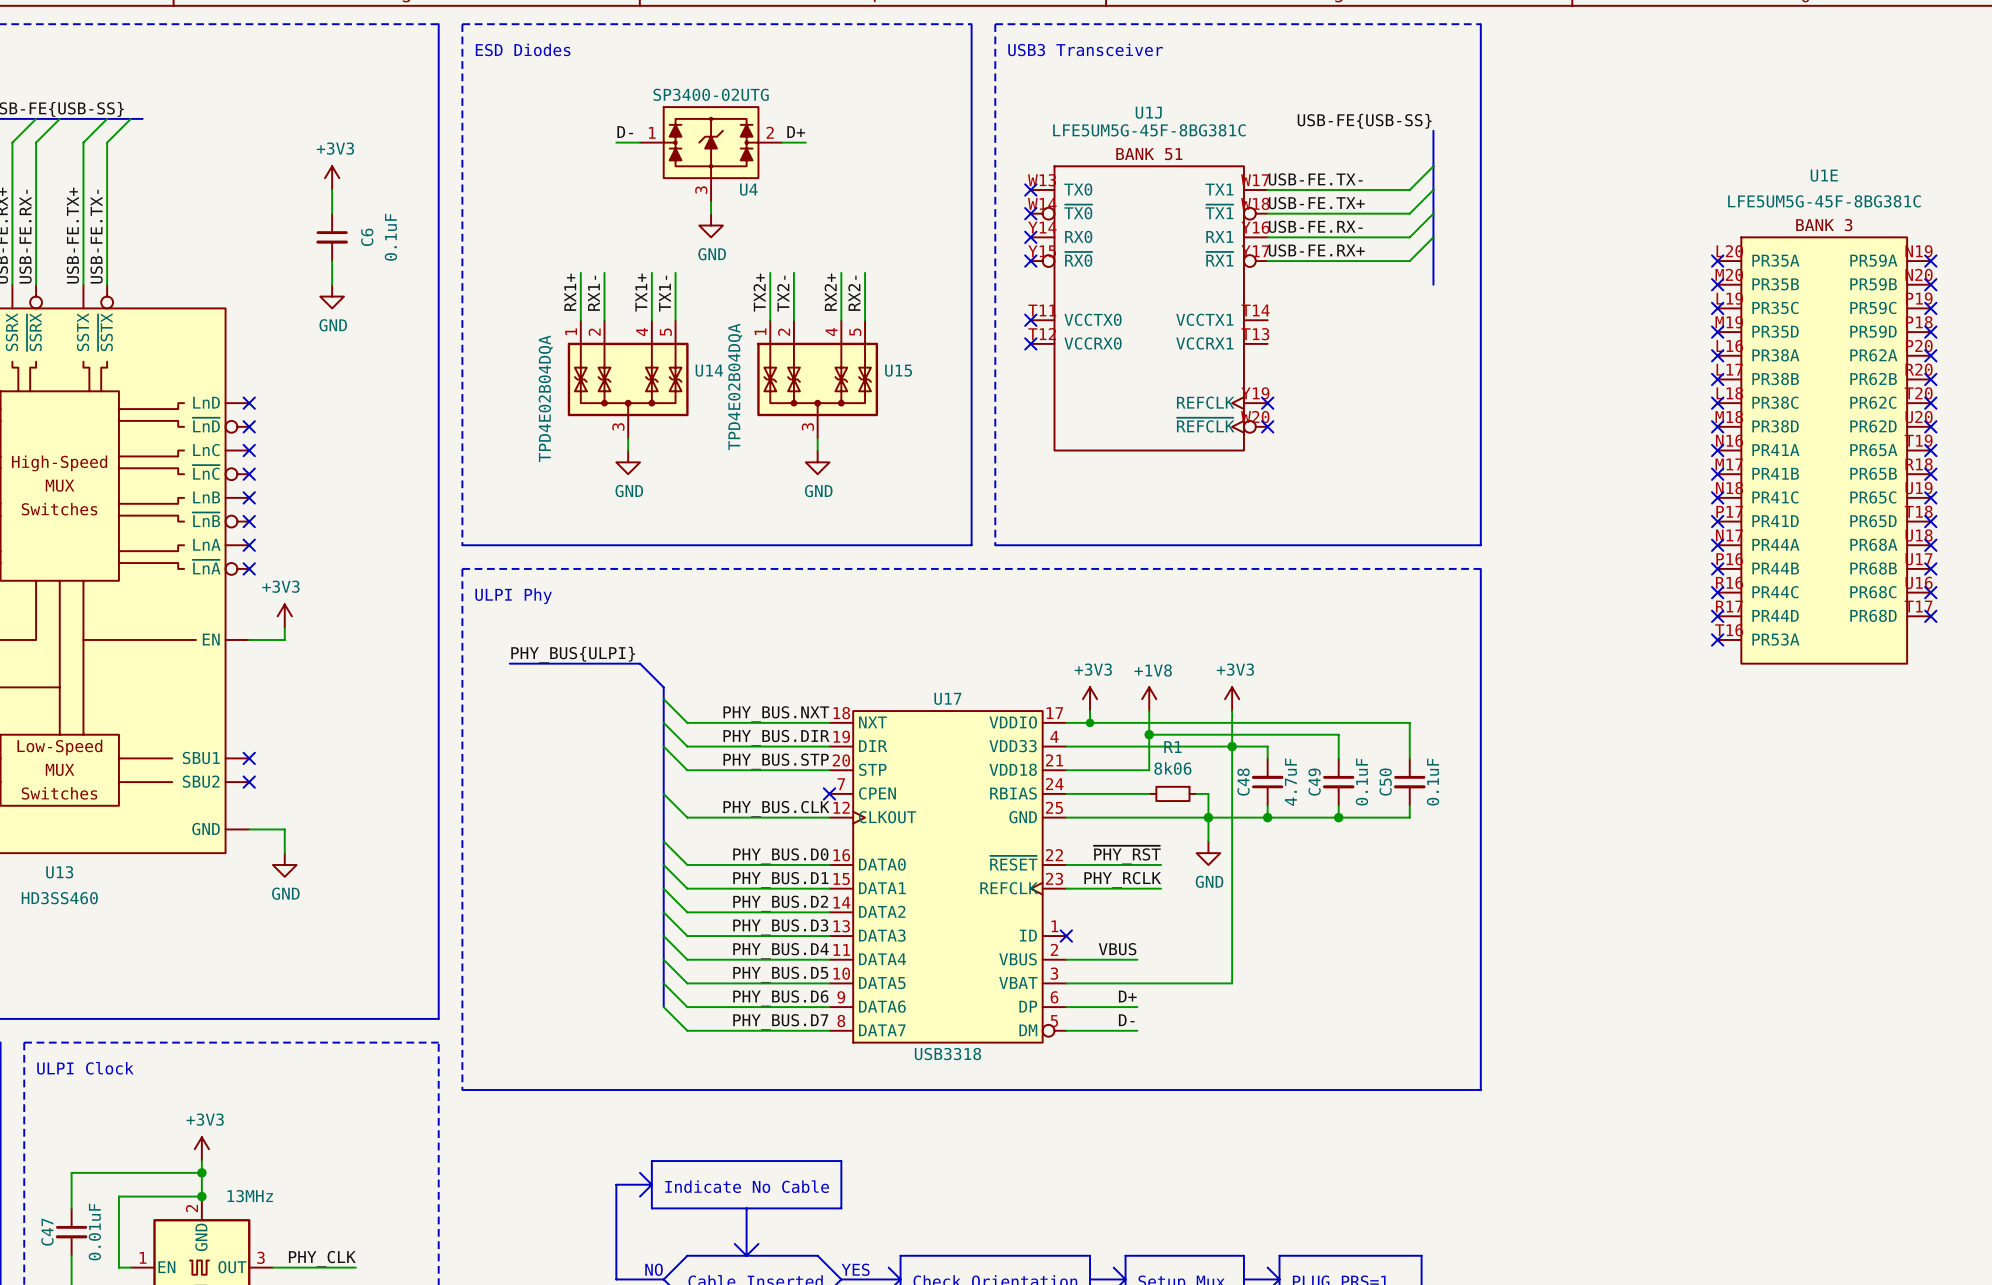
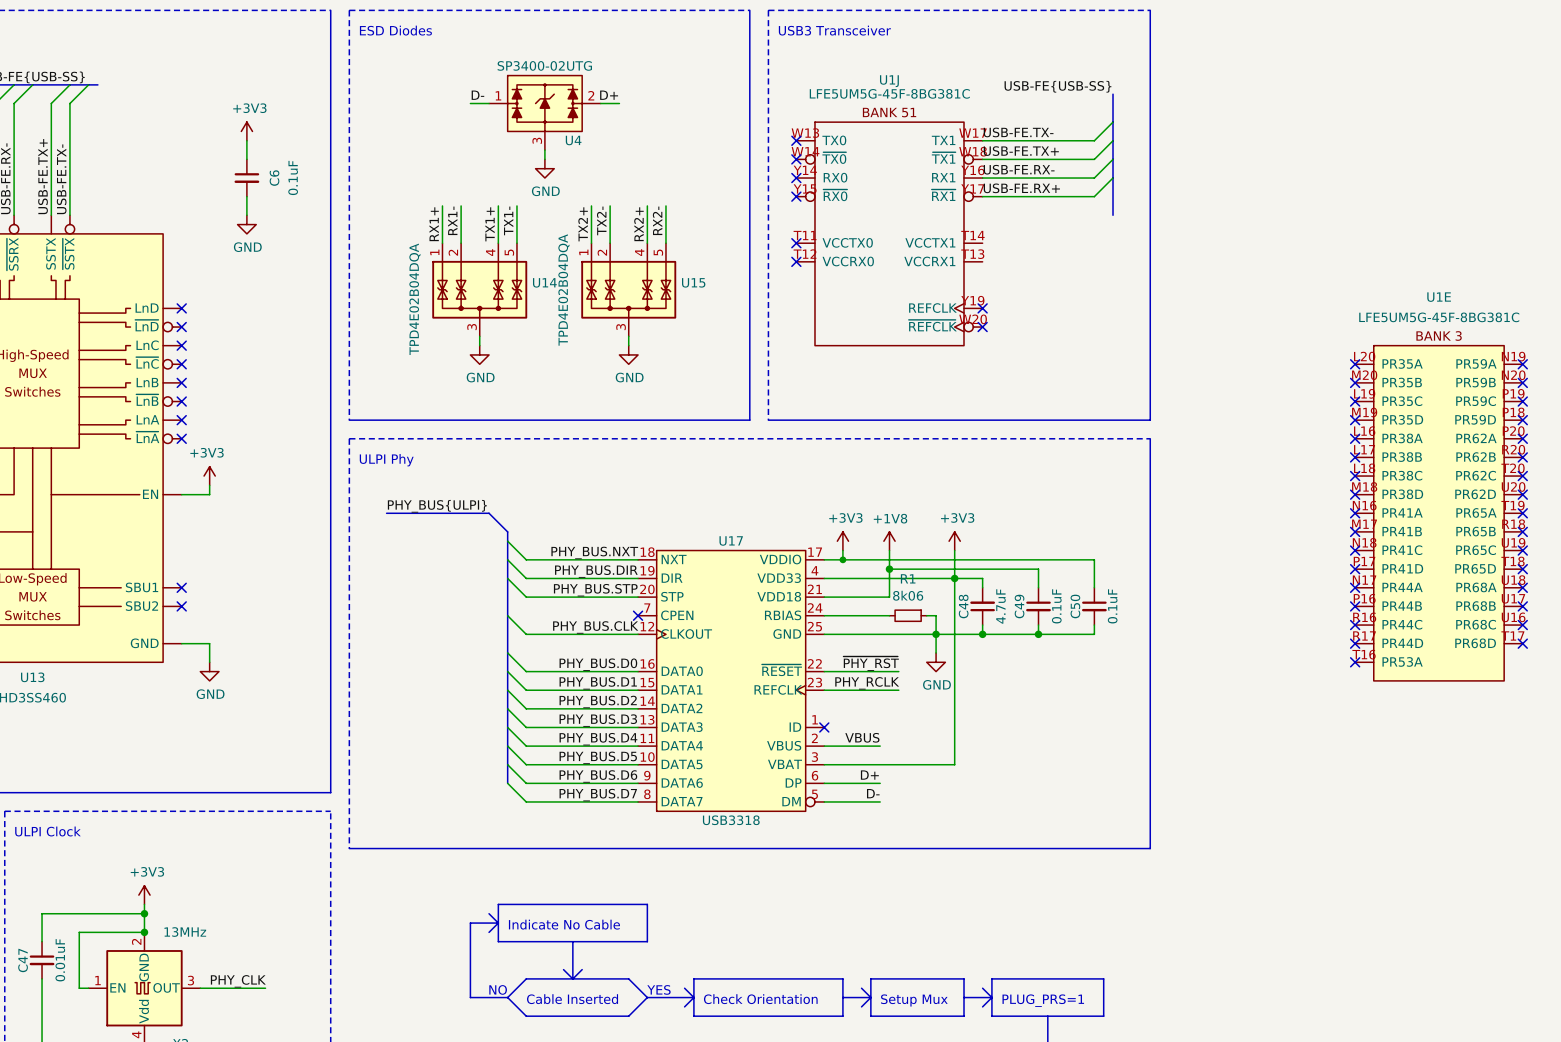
no-connect mark: (1717, 261) -> none
no-connect mark: (1930, 261) -> none
no-connect mark: (1717, 284) -> none
no-connect mark: (1930, 284) -> none
no-connect mark: (1717, 308) -> none
no-connect mark: (1930, 308) -> none
no-connect mark: (1717, 332) -> none
no-connect mark: (1930, 332) -> none
no-connect mark: (1717, 355) -> none
no-connect mark: (1930, 355) -> none
no-connect mark: (1717, 379) -> none
no-connect mark: (1930, 379) -> none
no-connect mark: (1717, 403) -> none
no-connect mark: (1930, 403) -> none
no-connect mark: (1717, 426) -> none
no-connect mark: (1930, 426) -> none
no-connect mark: (1717, 450) -> none
U1E position: (1824, 450) -> (1438, 513)
no-connect mark: (1930, 450) -> none
no-connect mark: (1717, 474) -> none
no-connect mark: none -> (1355, 364)
no-connect mark: (1930, 474) -> none
no-connect mark: none -> (1522, 364)
no-connect mark: (1717, 497) -> none
no-connect mark: none -> (1355, 382)
no-connect mark: (1930, 497) -> none
no-connect mark: none -> (1522, 382)
no-connect mark: (1717, 521) -> none
no-connect mark: none -> (1355, 401)
no-connect mark: (1930, 521) -> none
no-connect mark: none -> (1522, 401)
no-connect mark: (1717, 545) -> none
no-connect mark: none -> (1355, 420)
no-connect mark: (1930, 545) -> none
no-connect mark: none -> (1522, 420)
no-connect mark: (1717, 568) -> none
no-connect mark: none -> (1355, 438)
no-connect mark: (1930, 568) -> none
no-connect mark: none -> (1522, 438)
no-connect mark: (1717, 592) -> none
no-connect mark: none -> (1355, 457)
no-connect mark: (1930, 592) -> none
no-connect mark: none -> (1522, 457)
no-connect mark: (1717, 616) -> none
no-connect mark: none -> (1355, 476)
no-connect mark: (1930, 616) -> none
no-connect mark: none -> (1522, 476)
no-connect mark: (1717, 639) -> none
no-connect mark: none -> (1355, 494)
no-connect mark: none -> (1522, 494)
no-connect mark: none -> (1355, 513)
no-connect mark: none -> (1522, 513)
no-connect mark: none -> (1355, 531)
no-connect mark: none -> (1522, 531)
no-connect mark: none -> (1355, 550)
no-connect mark: none -> (1522, 550)
no-connect mark: none -> (1355, 569)
no-connect mark: none -> (1522, 569)
no-connect mark: none -> (1355, 587)
no-connect mark: none -> (1522, 587)
no-connect mark: none -> (1355, 606)
no-connect mark: none -> (1522, 606)
no-connect mark: none -> (1355, 625)
no-connect mark: none -> (1522, 625)
no-connect mark: none -> (1355, 643)
no-connect mark: none -> (1522, 643)
no-connect mark: none -> (1355, 662)

